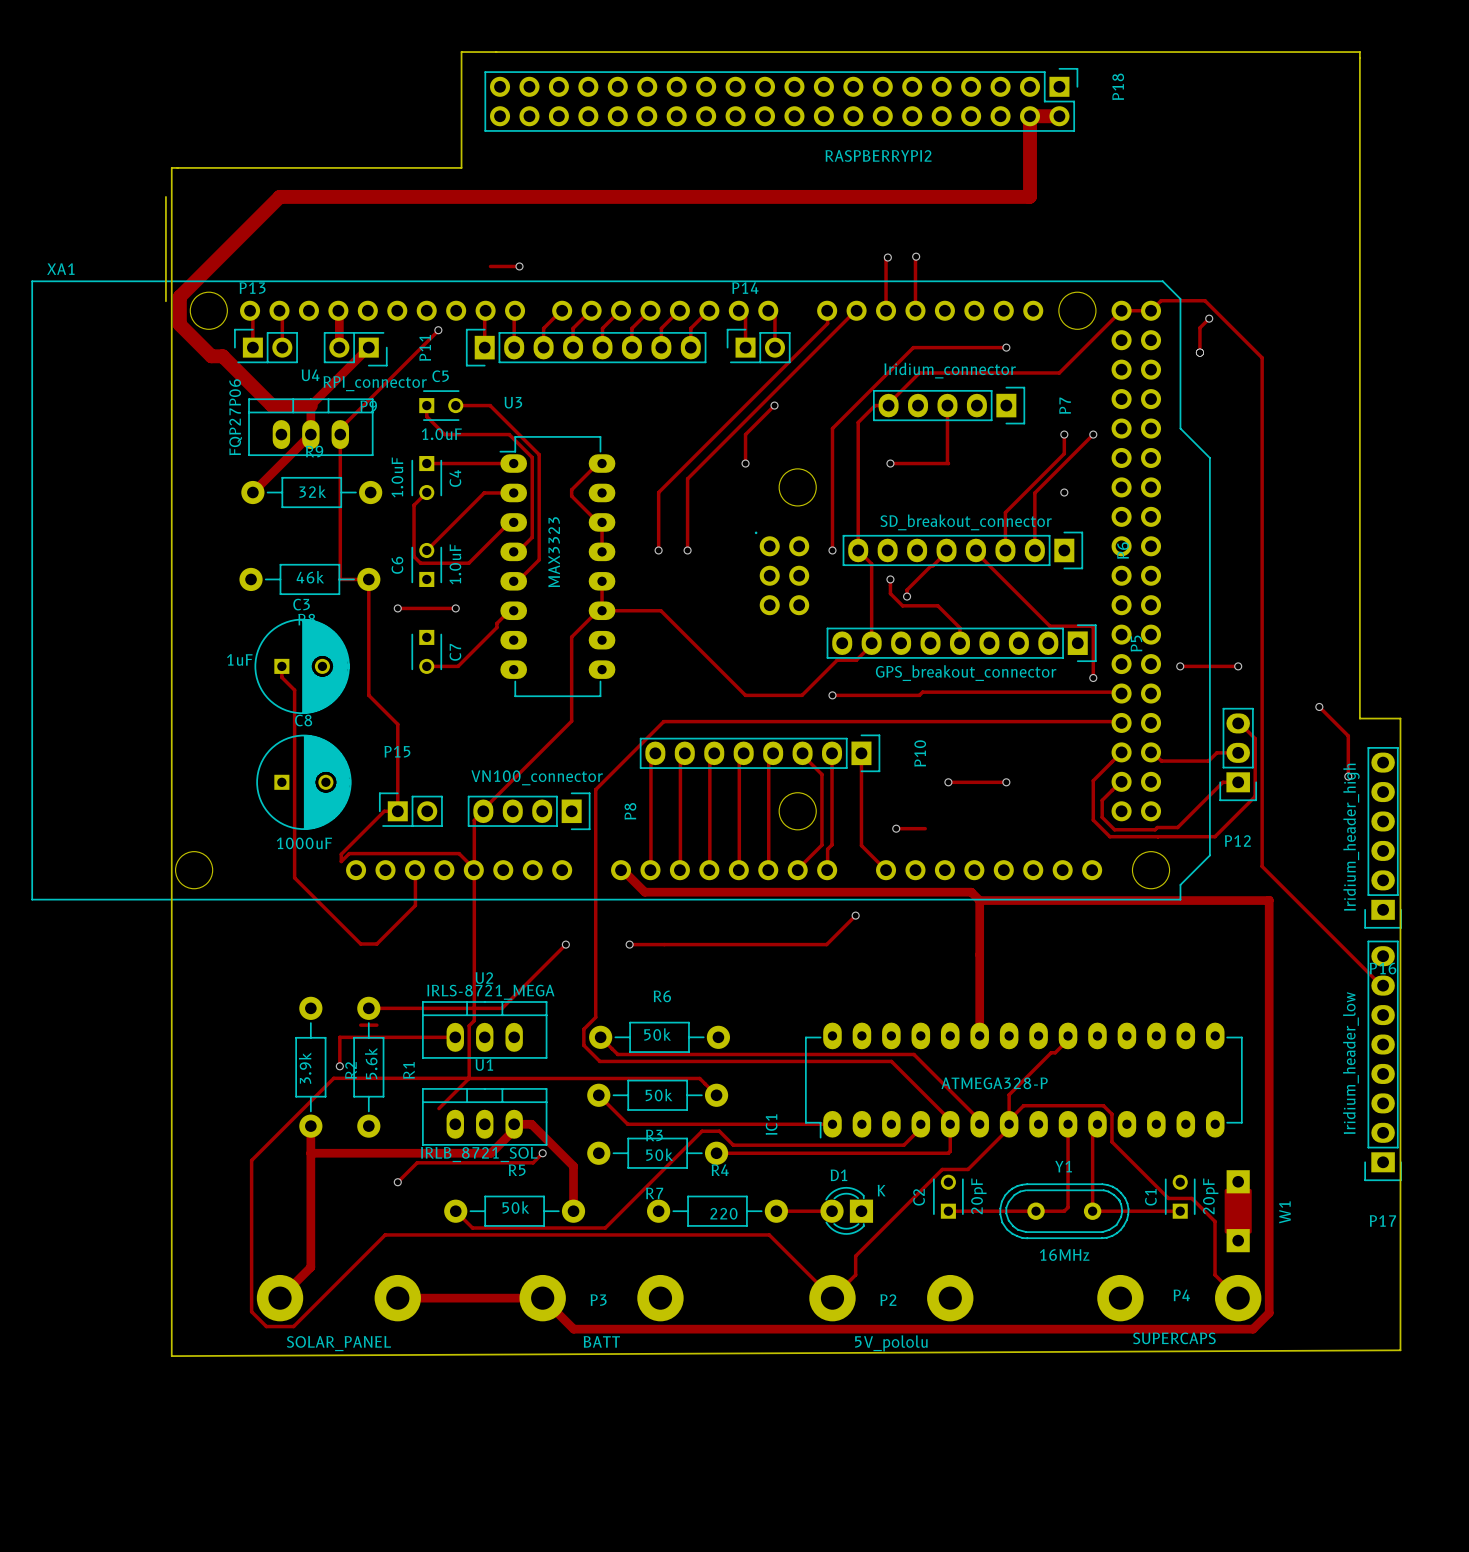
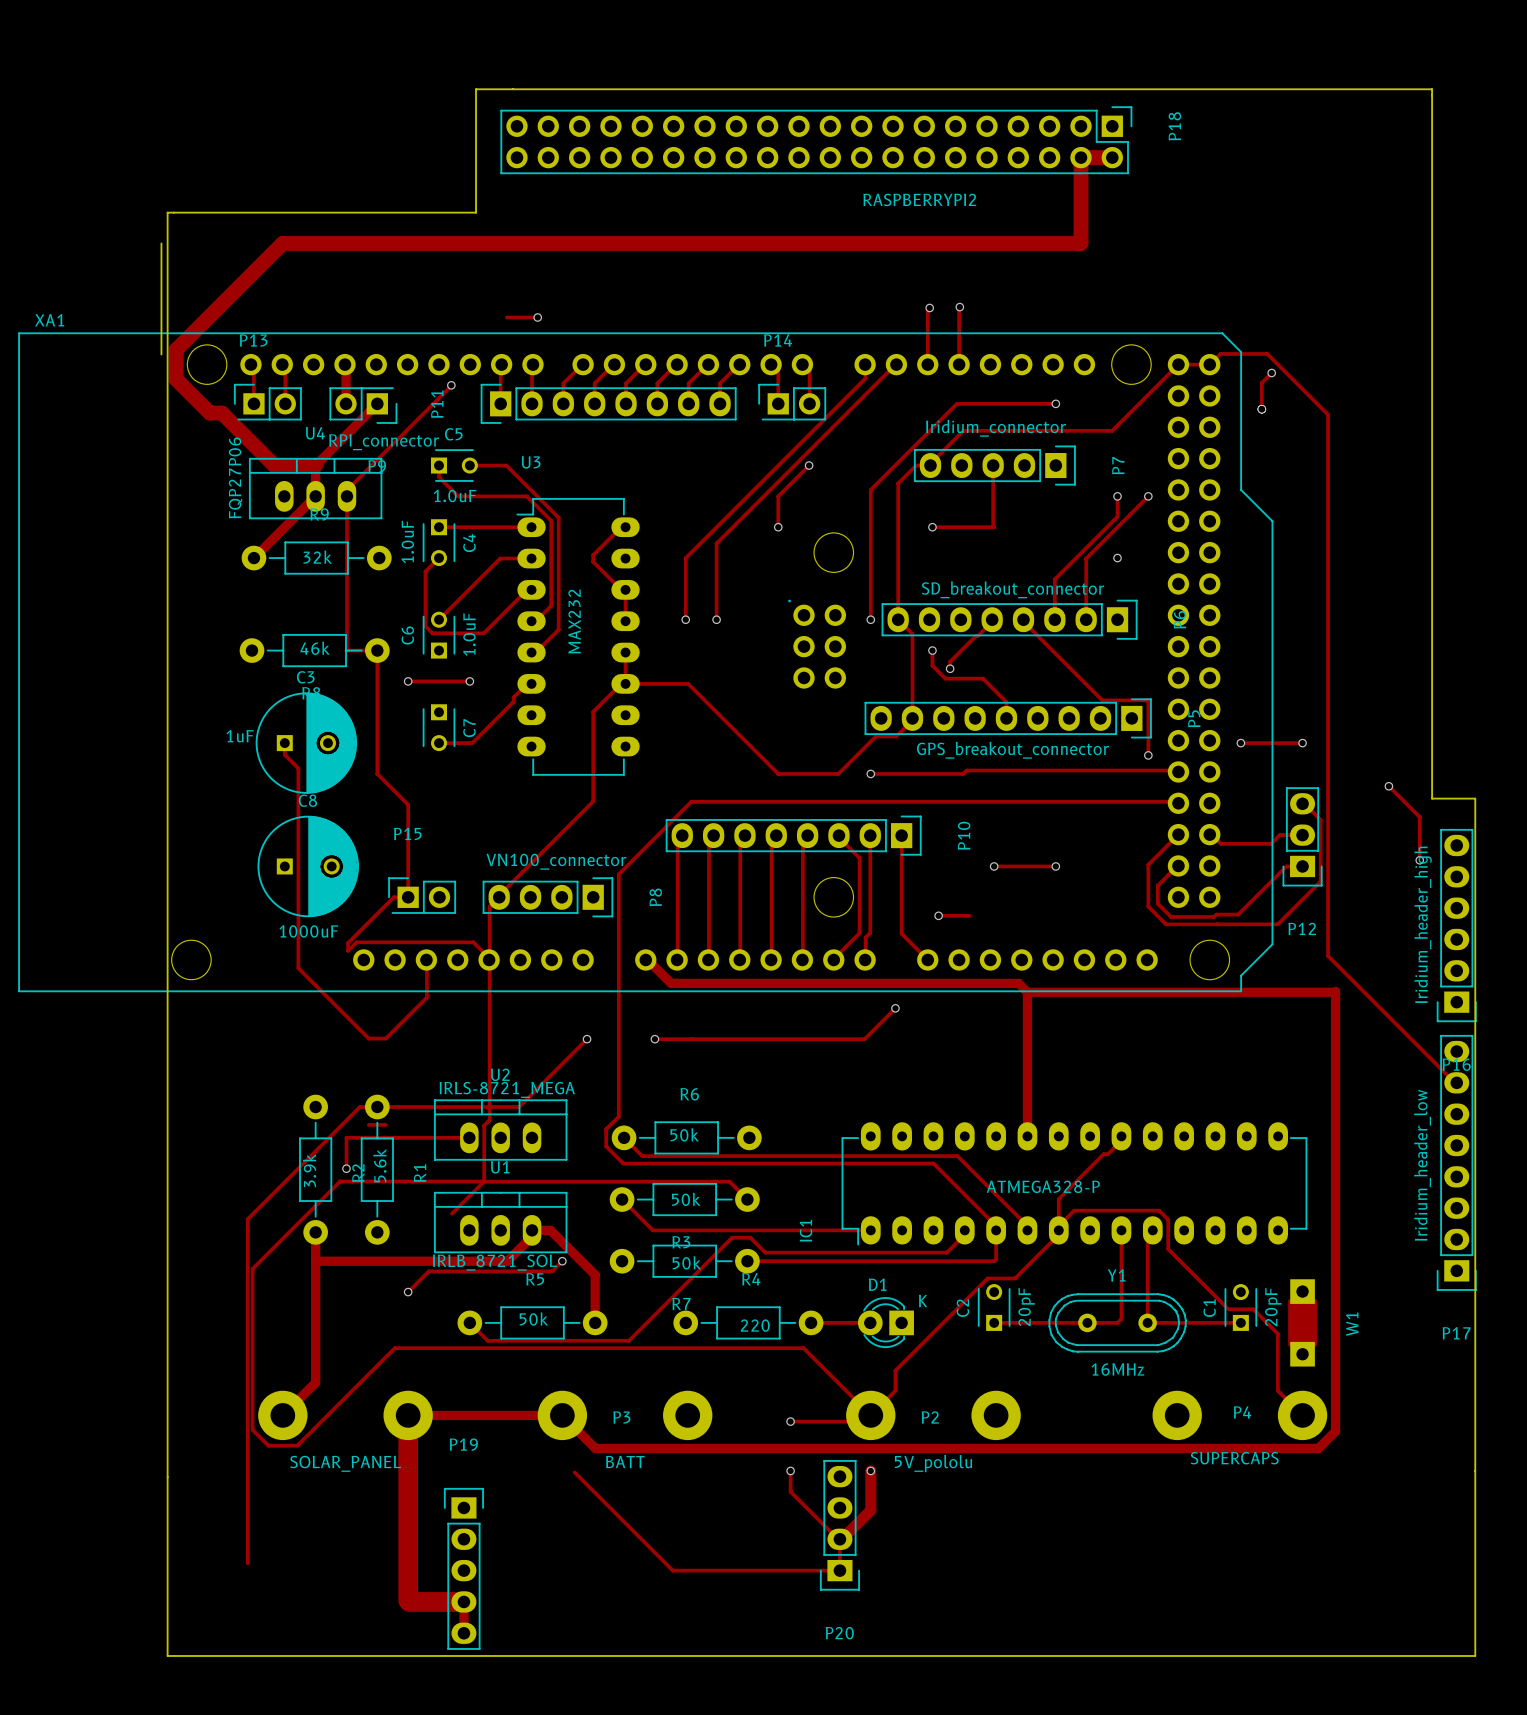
U3 value: MAX3323 (554, 552) -> MAX232 (574, 621)
track: none -> (377, 1107) (359, 1107) (247, 1219) (247, 1563)
track: none -> (408, 1415) (408, 1600) (463, 1601) (463, 1633)
track: none -> (870, 1415) (864, 1421) (790, 1421)
via: none -> (790, 1421)
track: none -> (790, 1470) (790, 1491) (838, 1539) (841, 1539) (870, 1510) (870, 1470)
via: none -> (790, 1470)
via: none -> (870, 1470)
board edge: (1400, 1350) (171, 1356) -> (1475, 1470) (1475, 1655) (167, 1655) (167, 1477)
track: none -> (574, 1472) (672, 1570) (839, 1570) (839, 1539)
P20: none -> (839, 1525)
P19: none -> (463, 1568)

